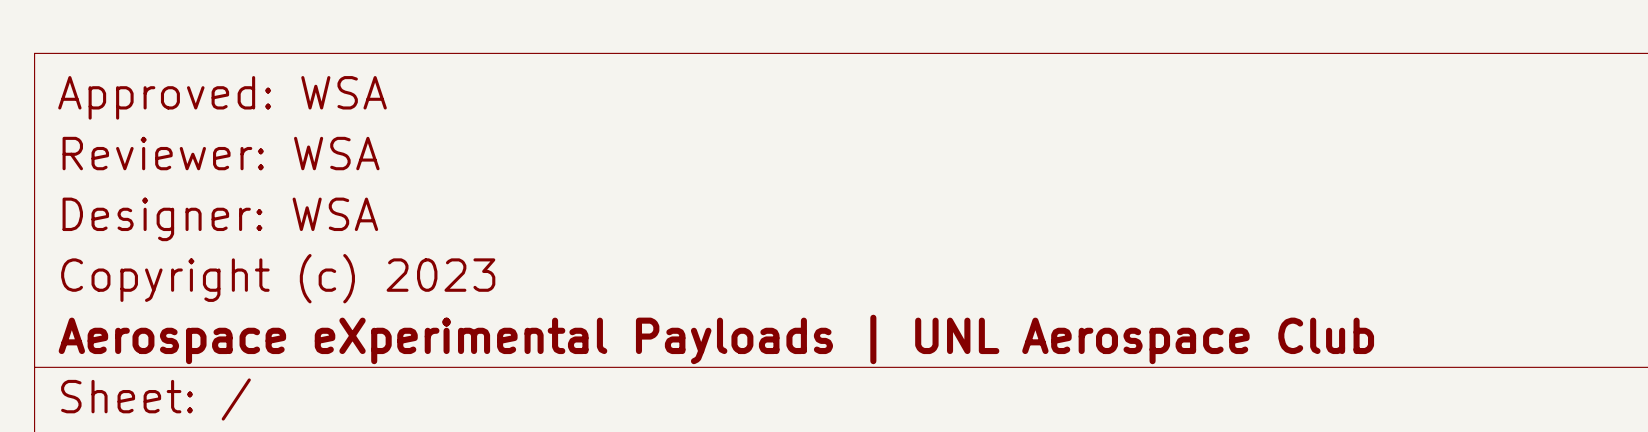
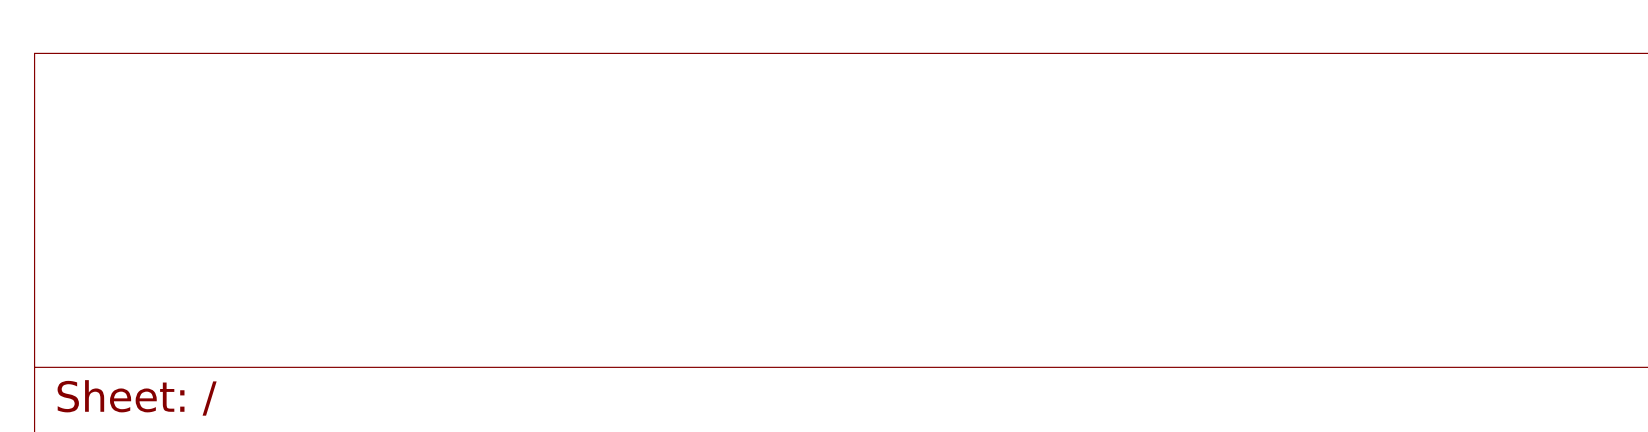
title block: Approved: WSA (222, 97) -> none
title block: Reviewer: WSA (221, 153) -> none
title block: Designer: WSA (220, 219) -> none
title block: Copyright (c) 2023 (278, 278) -> none
title block: Aerospace eXperimental Payloads | UNL Aerospace Club (716, 339) -> none

